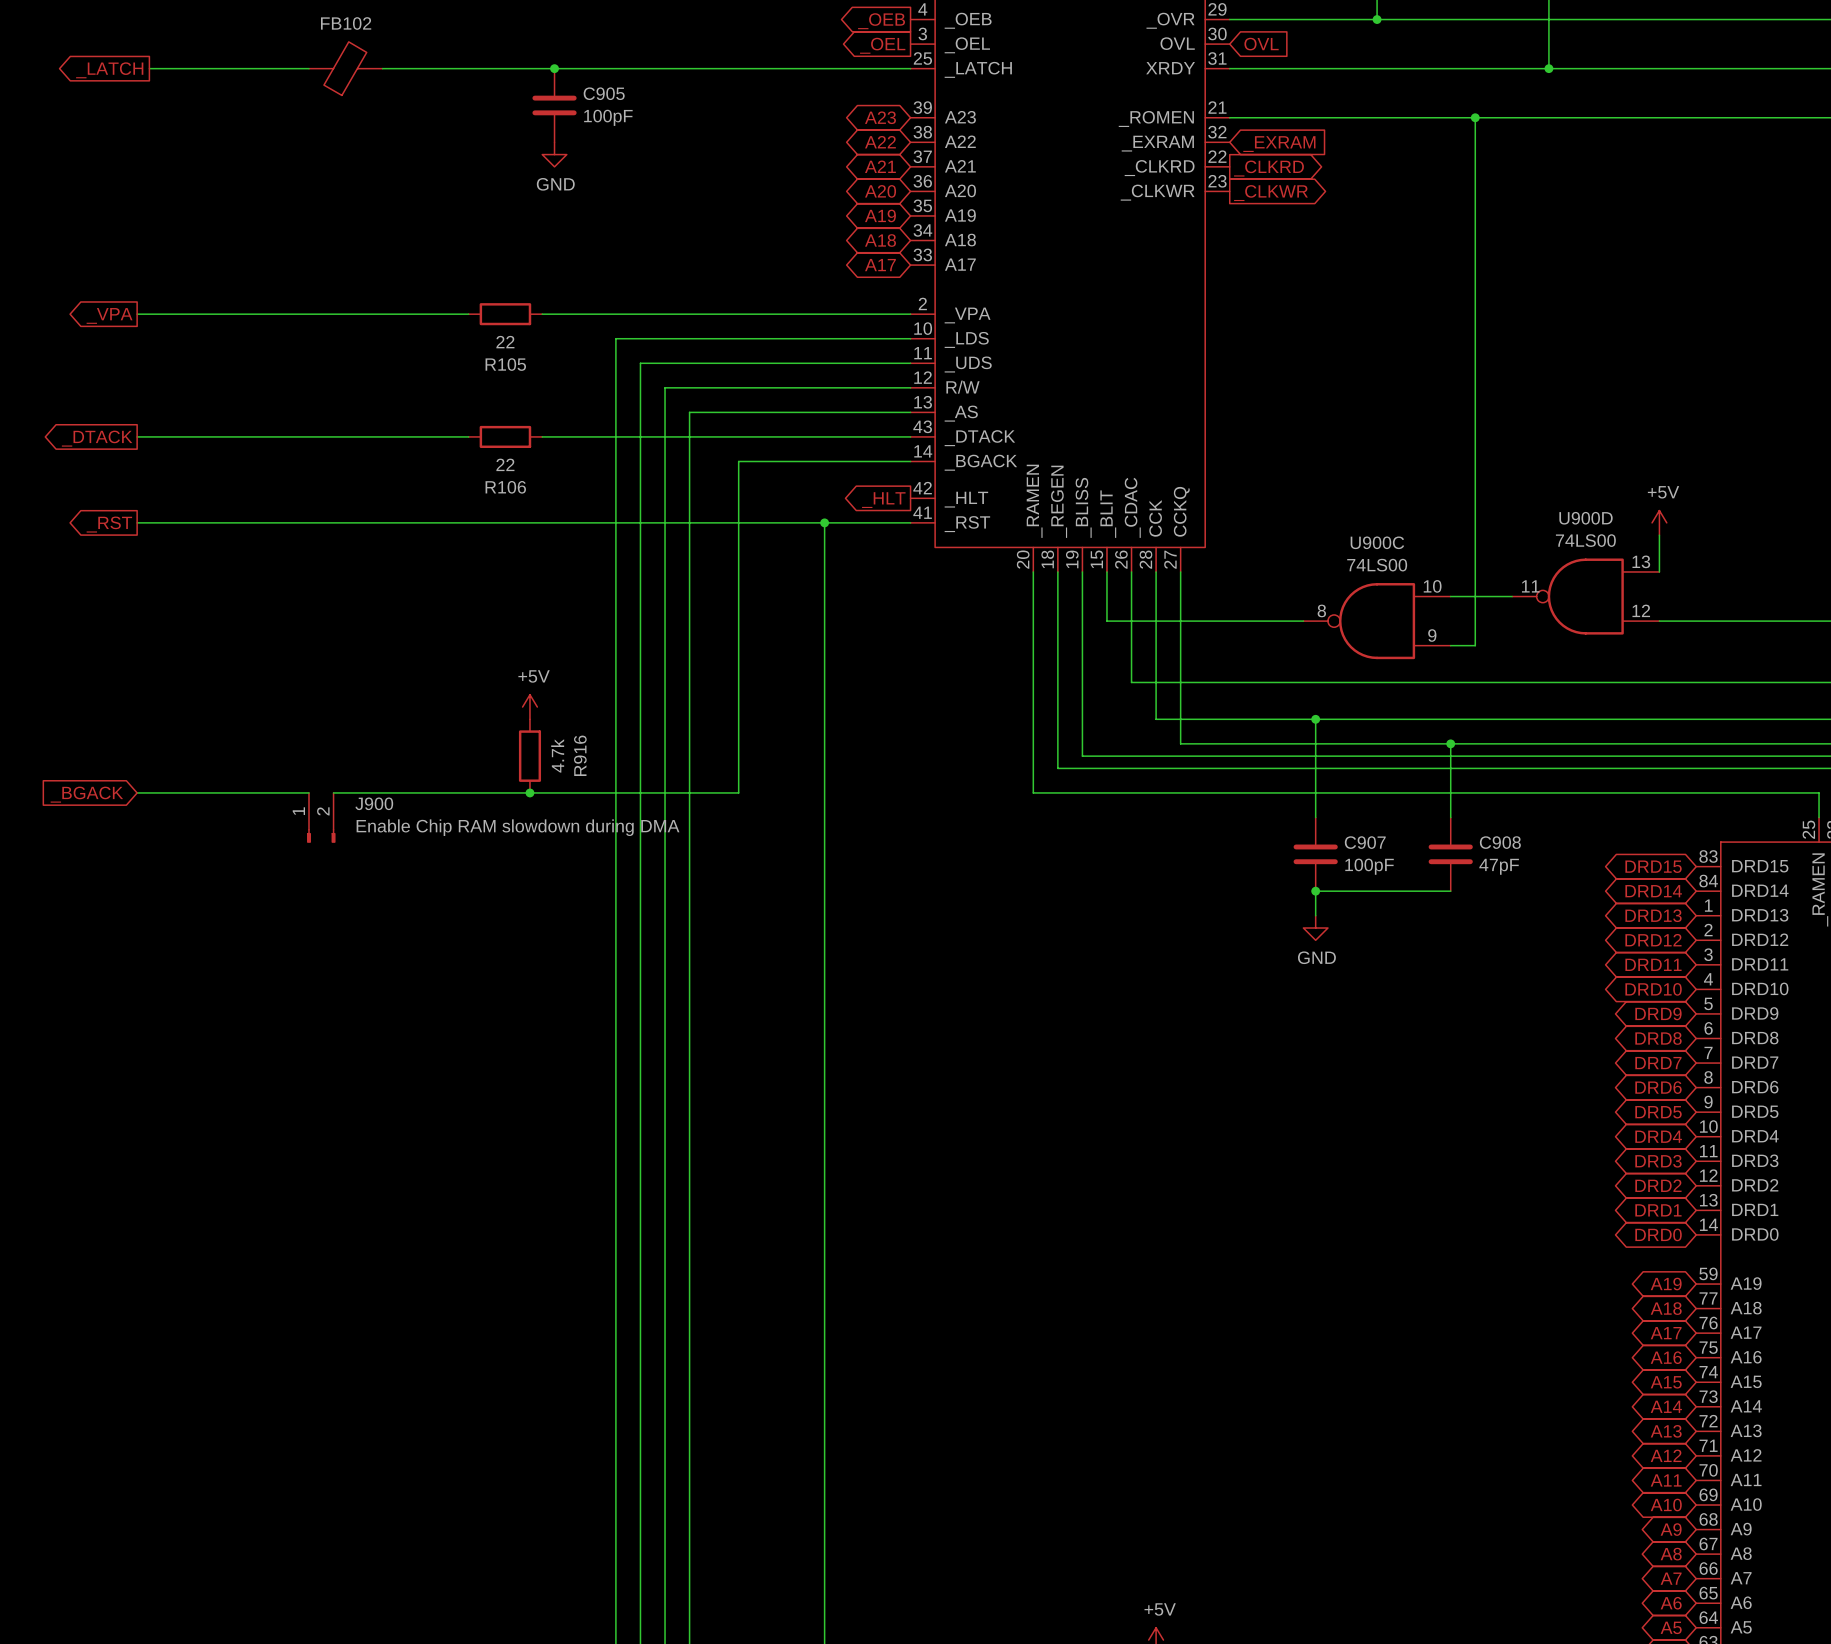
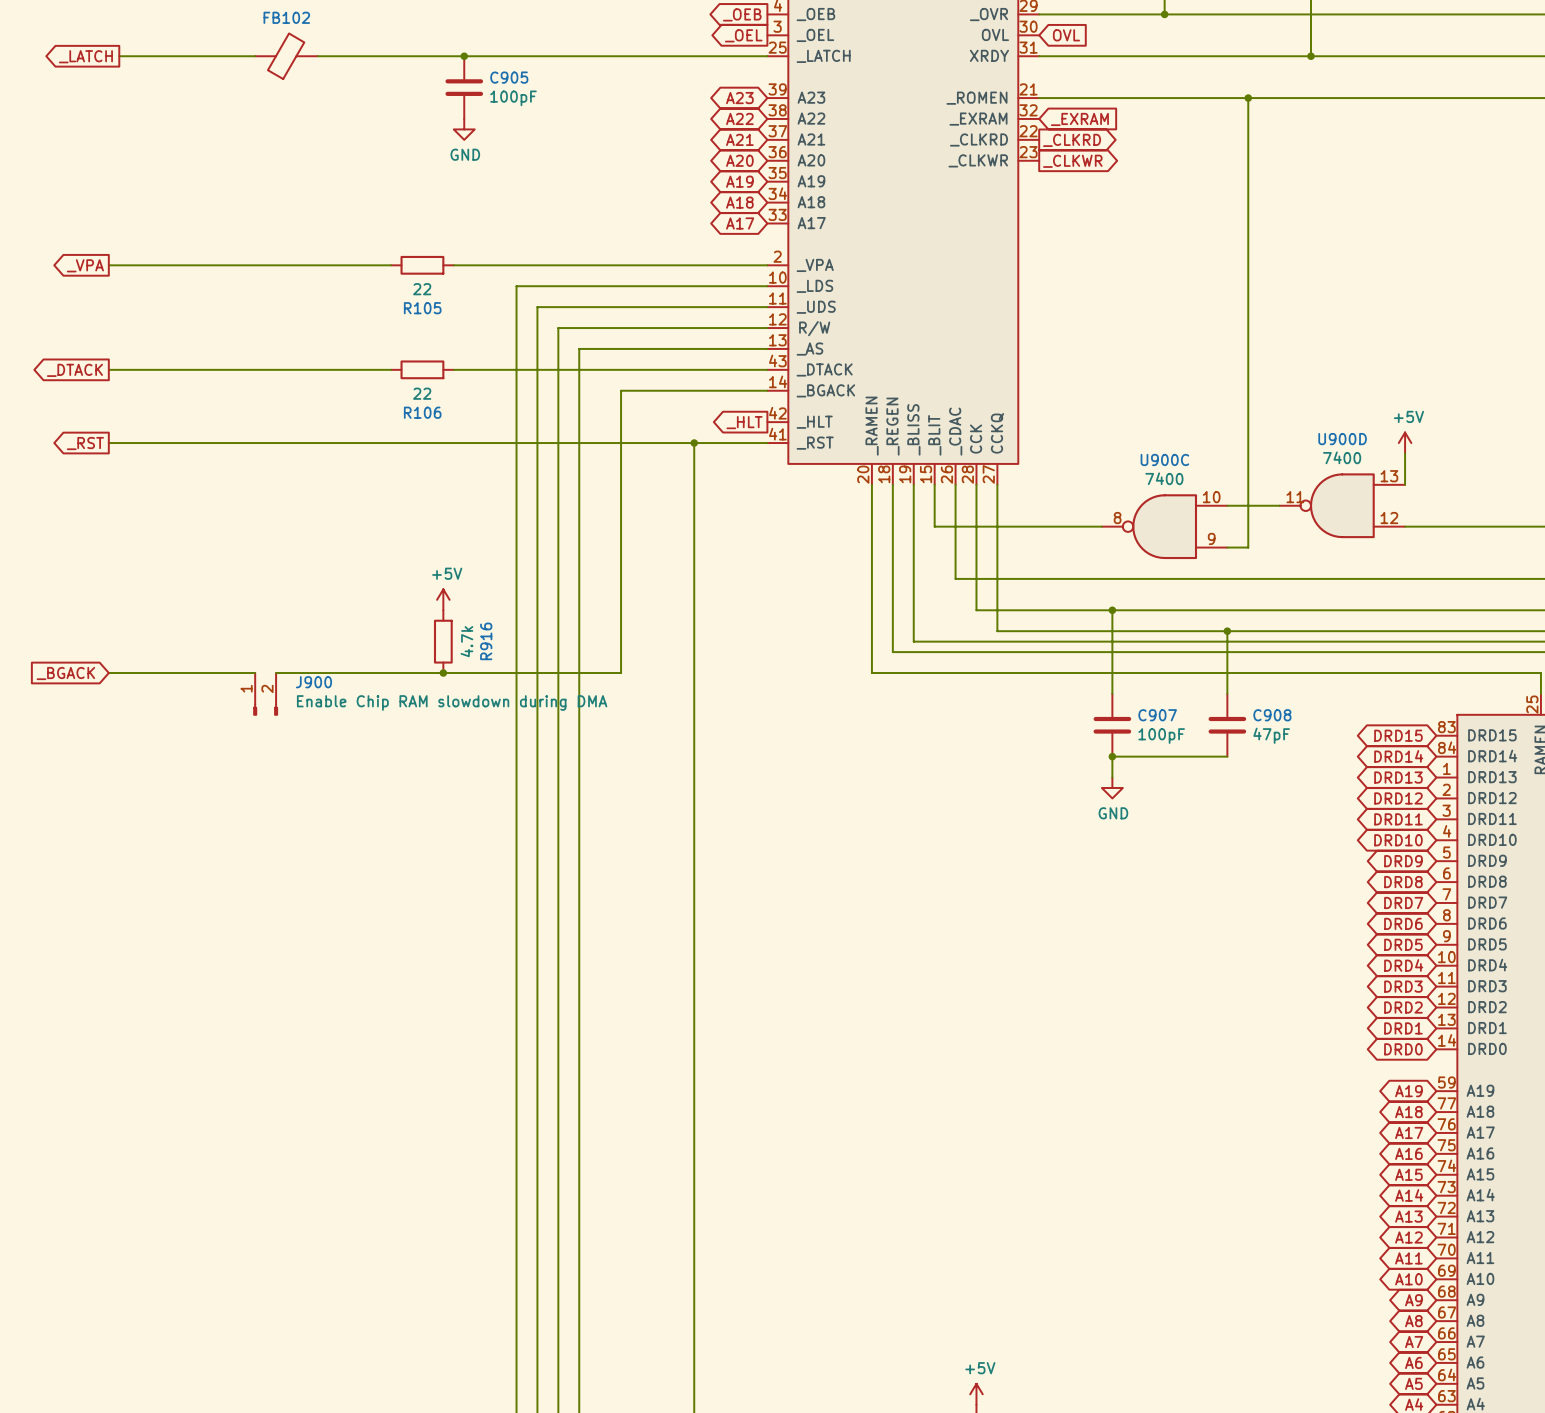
U900D value: 74LS00 (1585, 540) -> 7400 (1342, 457)
U900C value: 74LS00 (1377, 565) -> 7400 (1164, 478)

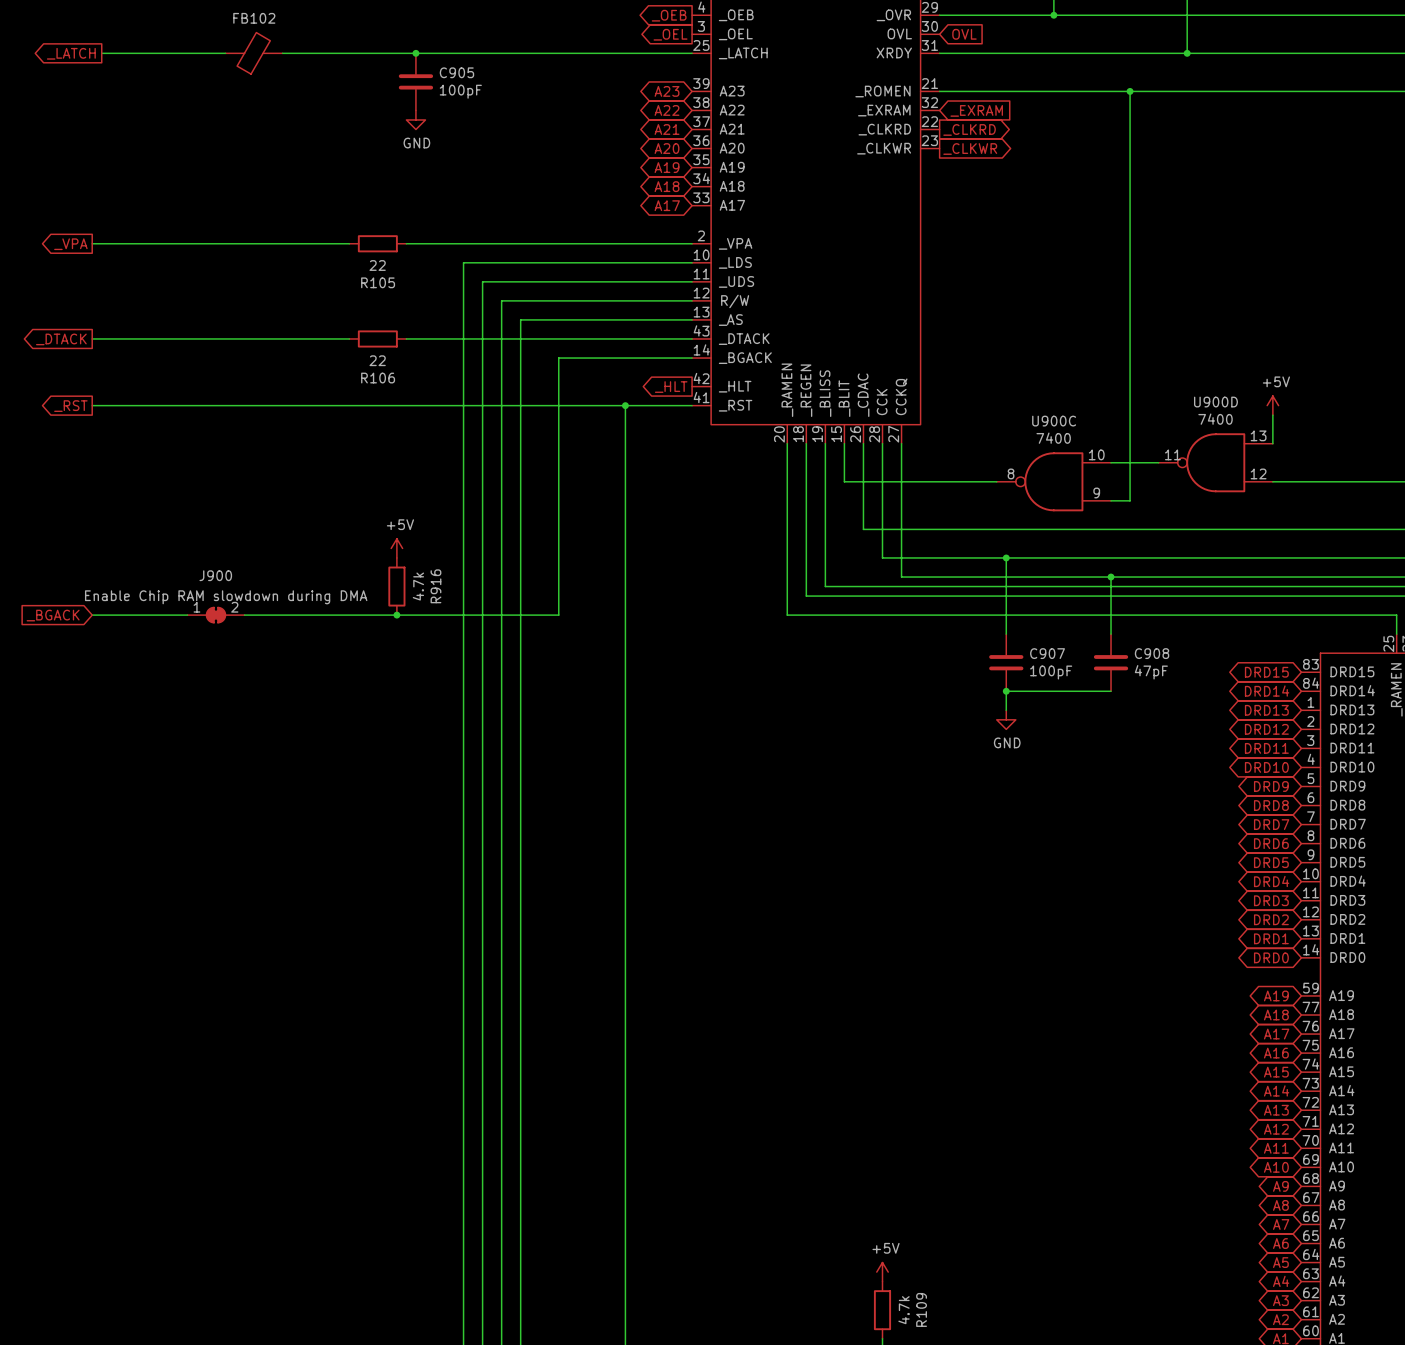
J900 symbol: [253, 673, 278, 716] -> [187, 607, 245, 623]
J900 name position: J900 (313, 682) -> J900 (215, 575)
J900 value position: Enable Chip RAM slowdown during DMA (452, 702) -> Enable Chip RAM slowdown during DMA (226, 597)

